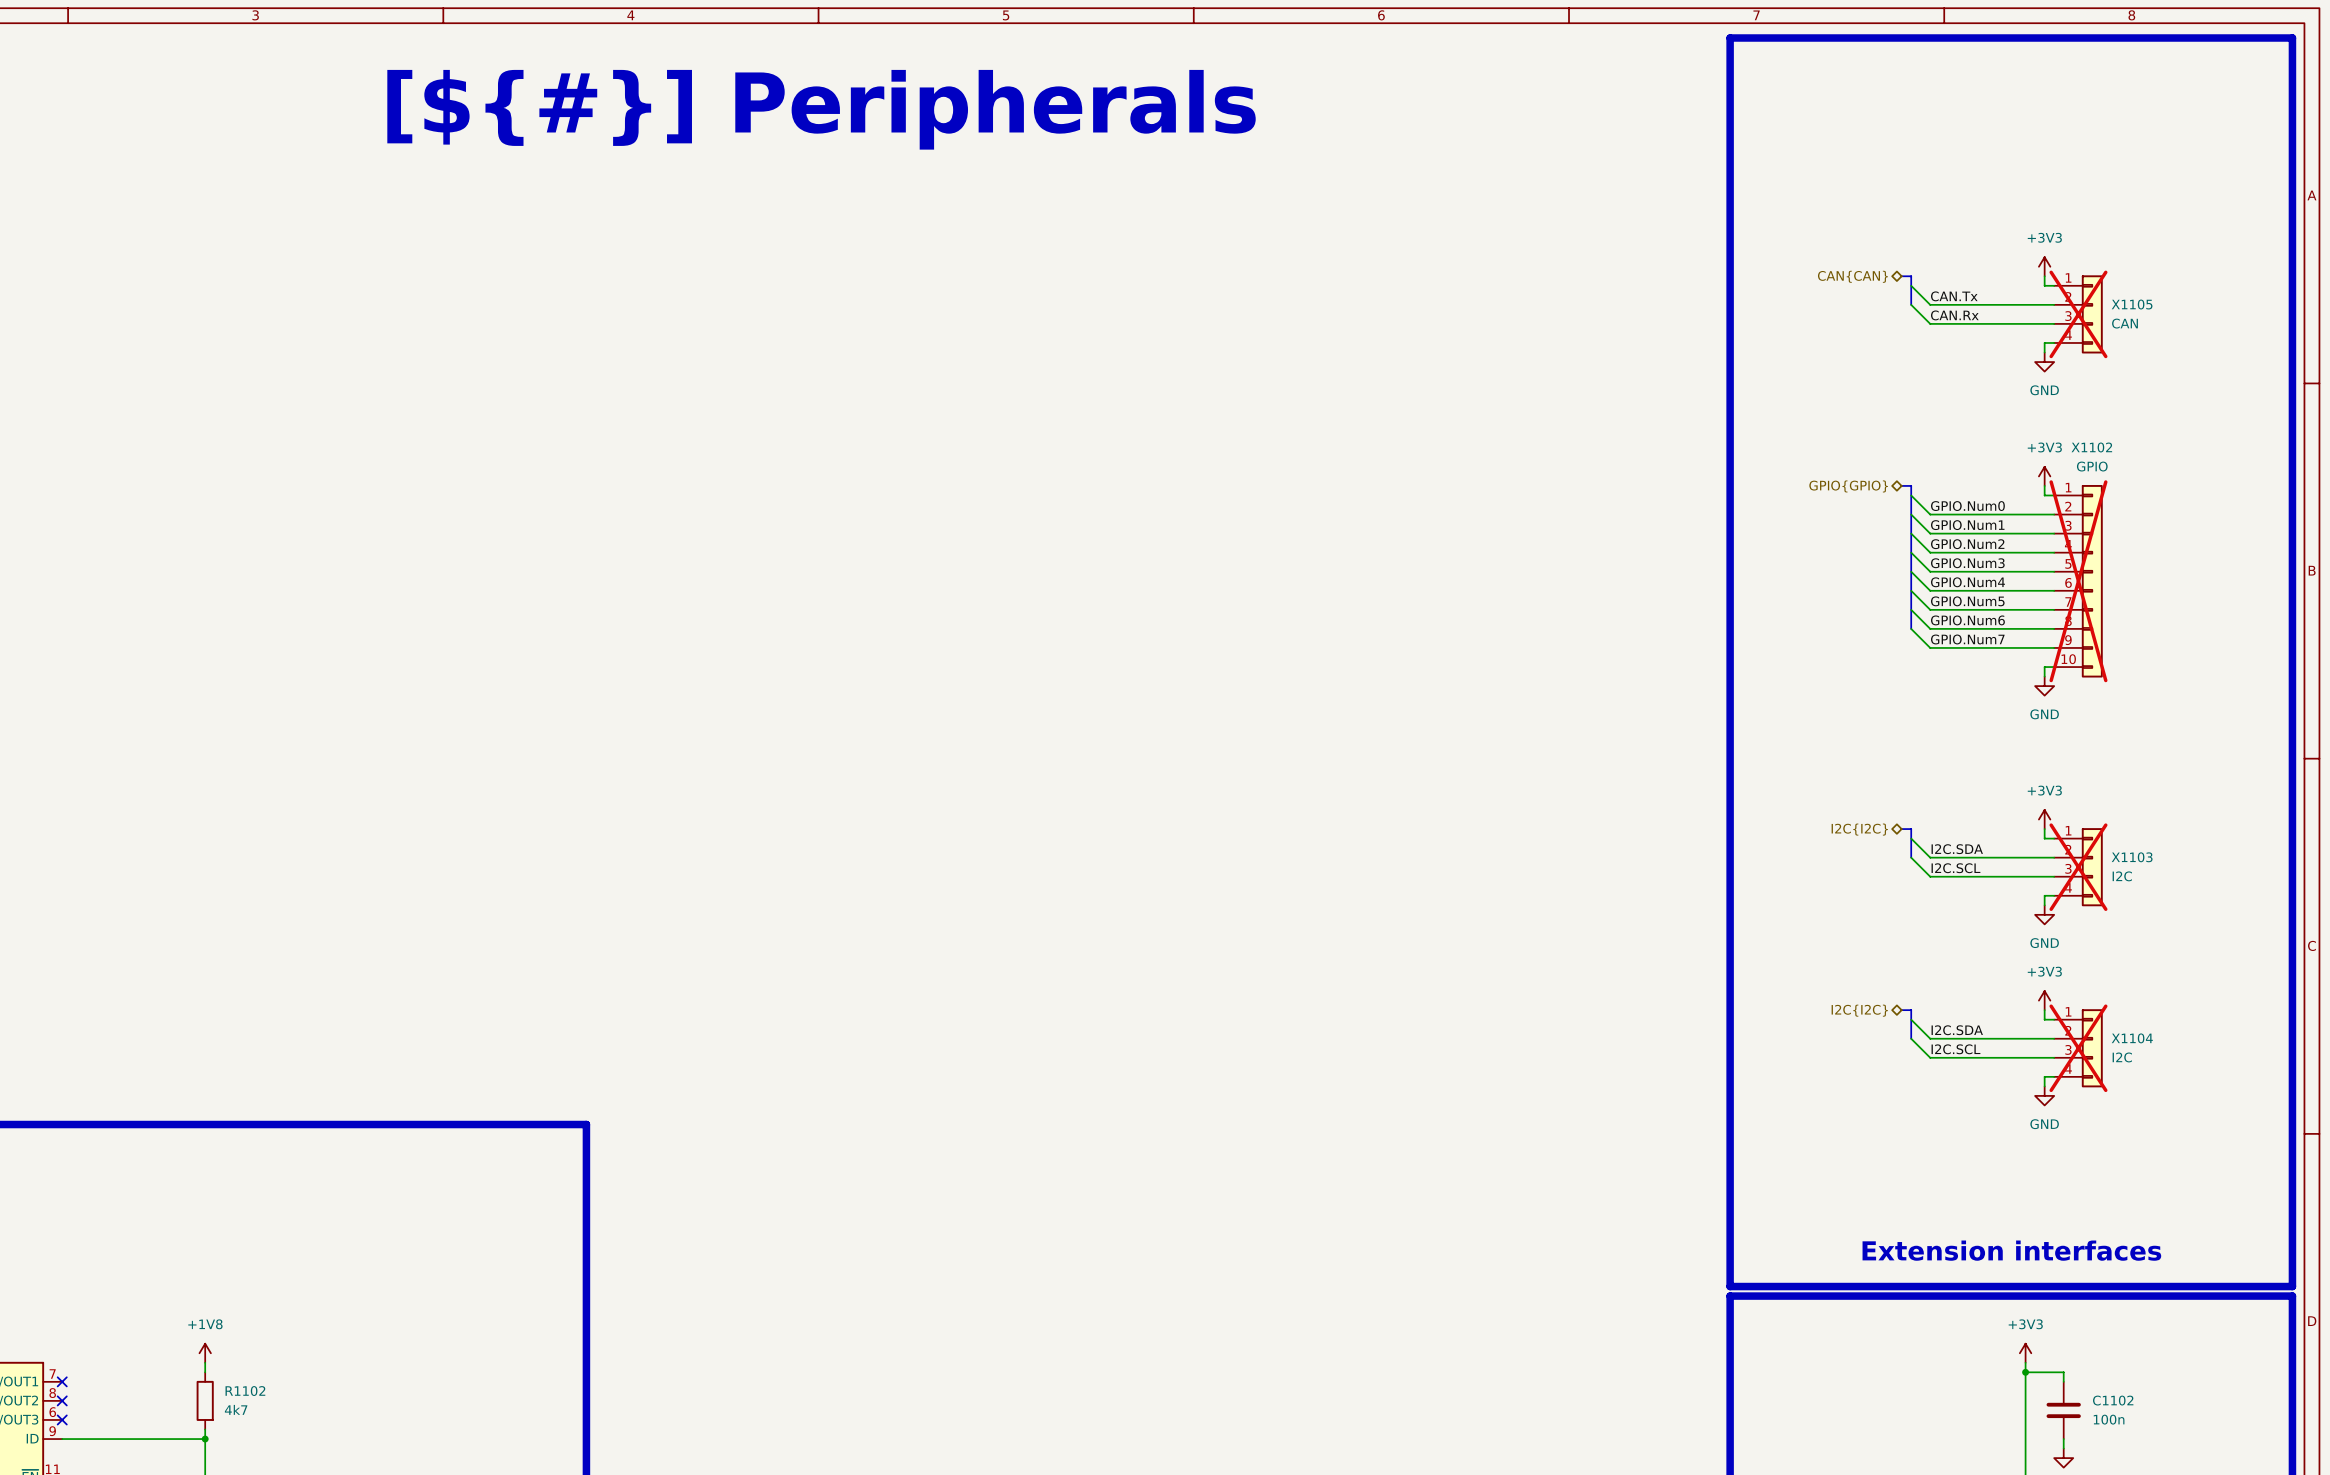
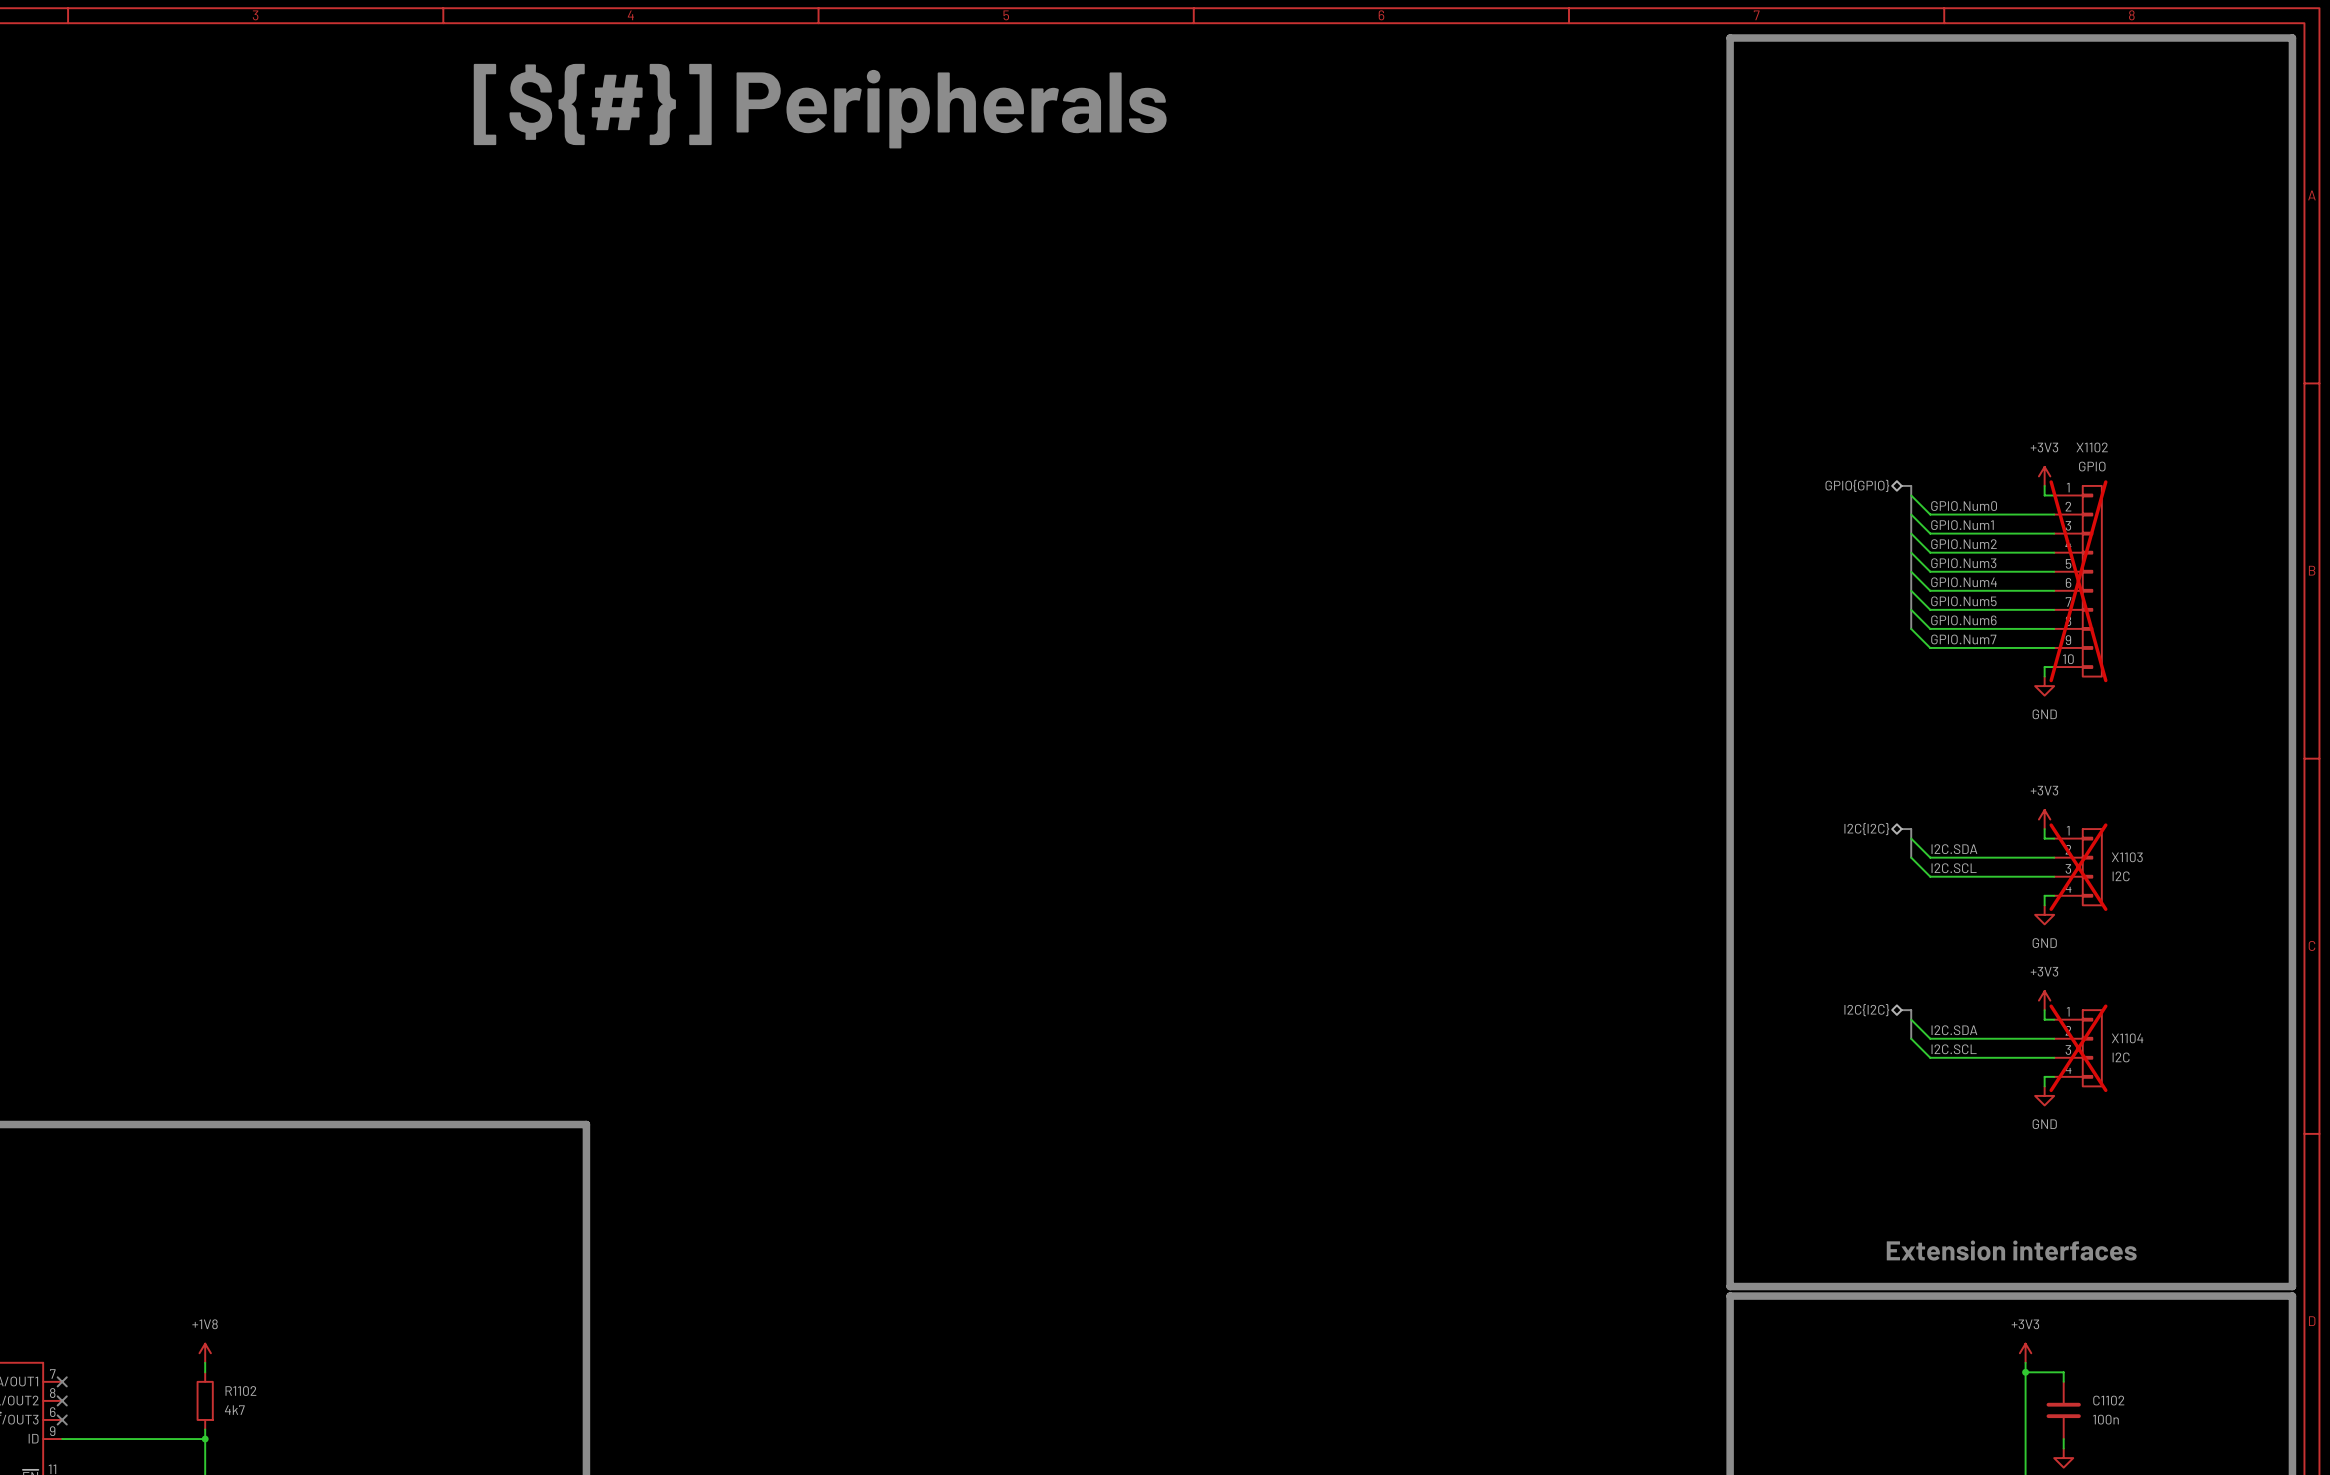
power symbol: +3V3 (2044, 266) -> none
hierarchical label: CAN{CAN} (1852, 276) -> none
bus: (1901, 276) (1911, 276) (1911, 304) -> none
wire: (2044, 276) (2044, 285) (2054, 285) -> none
wire: (1911, 285) (1930, 304) (2054, 304) -> none
label: CAN.Tx (1954, 296) -> none
wire: (1911, 304) (1930, 323) (2054, 323) -> none
X1105: CAN (2078, 314) -> none
label: CAN.Rx (1954, 315) -> none
wire: (2054, 342) (2044, 342) (2044, 352) -> none
power symbol: GND (2044, 362) -> none

